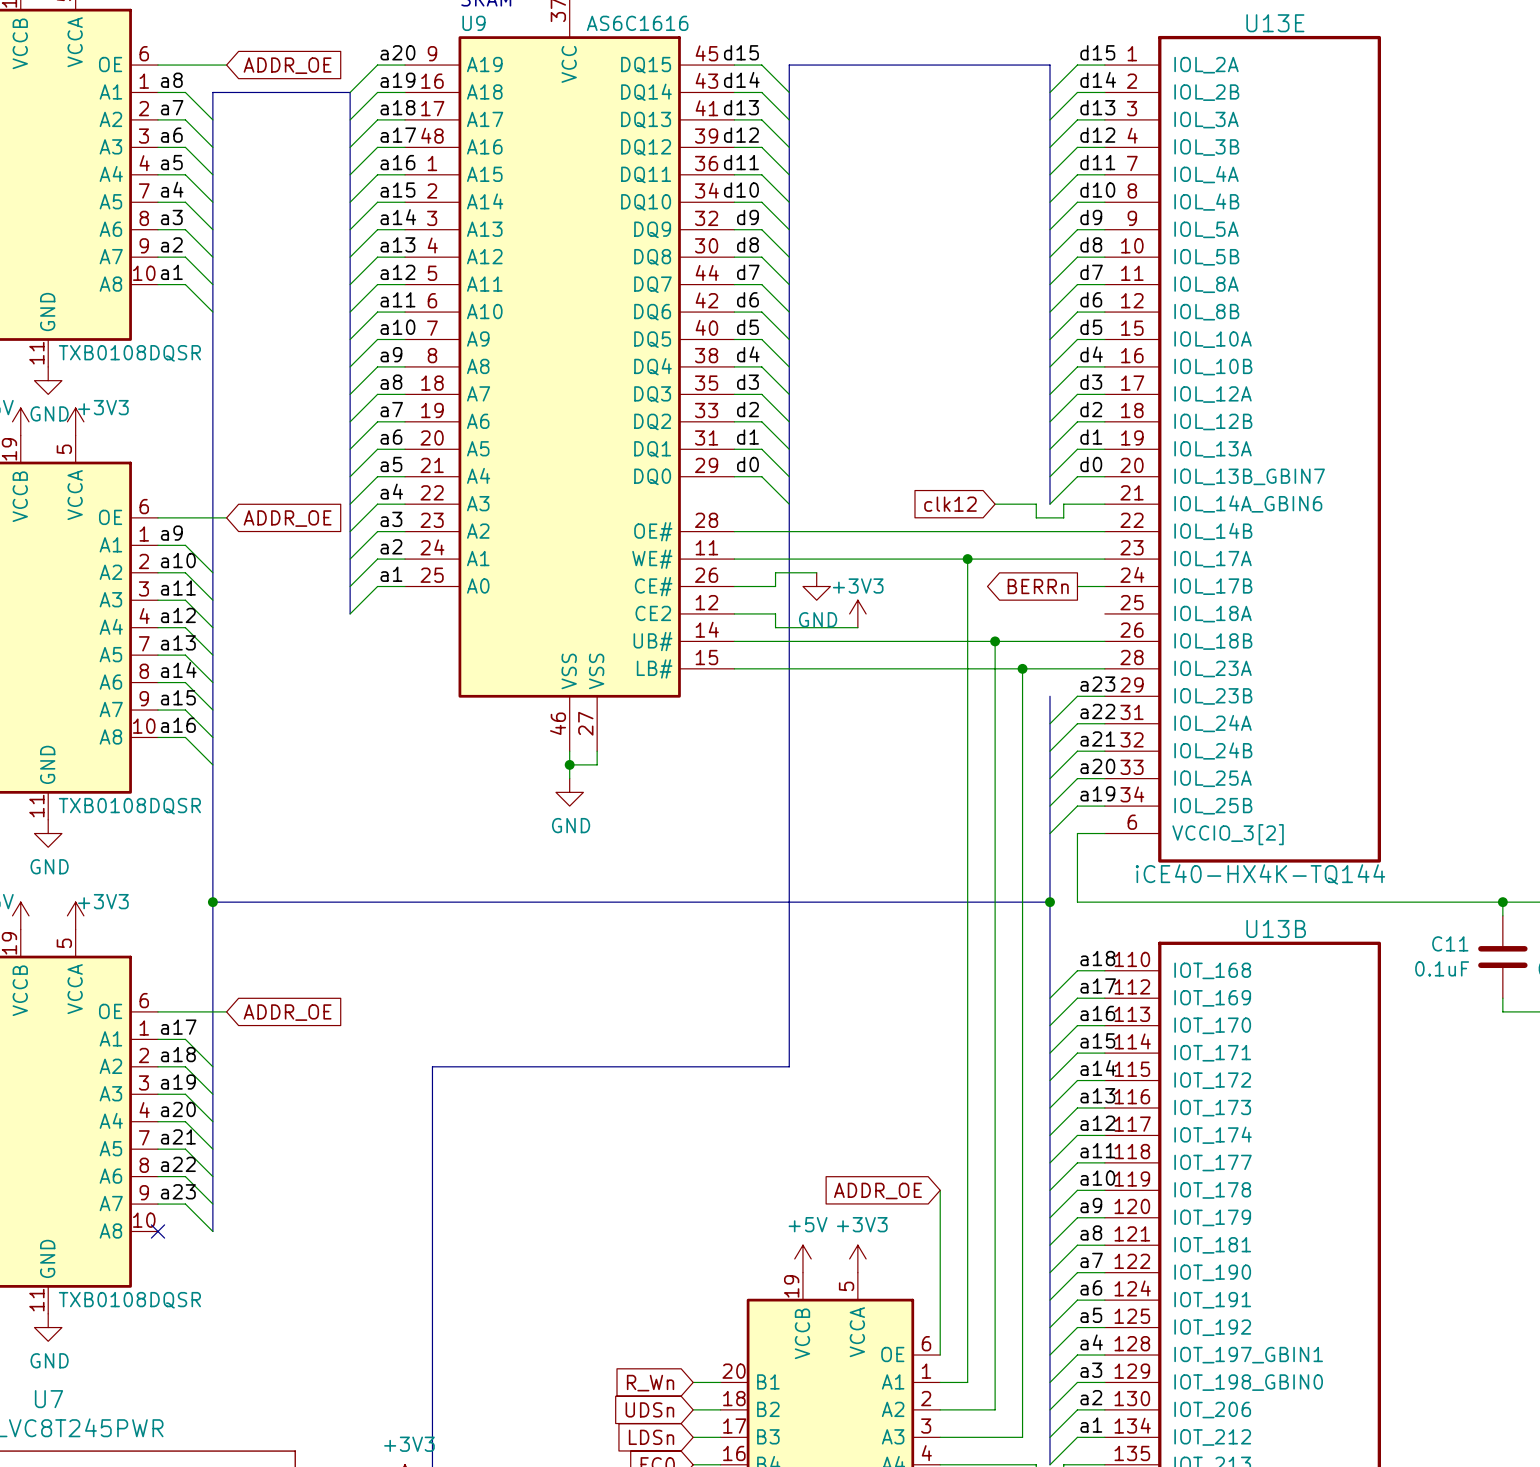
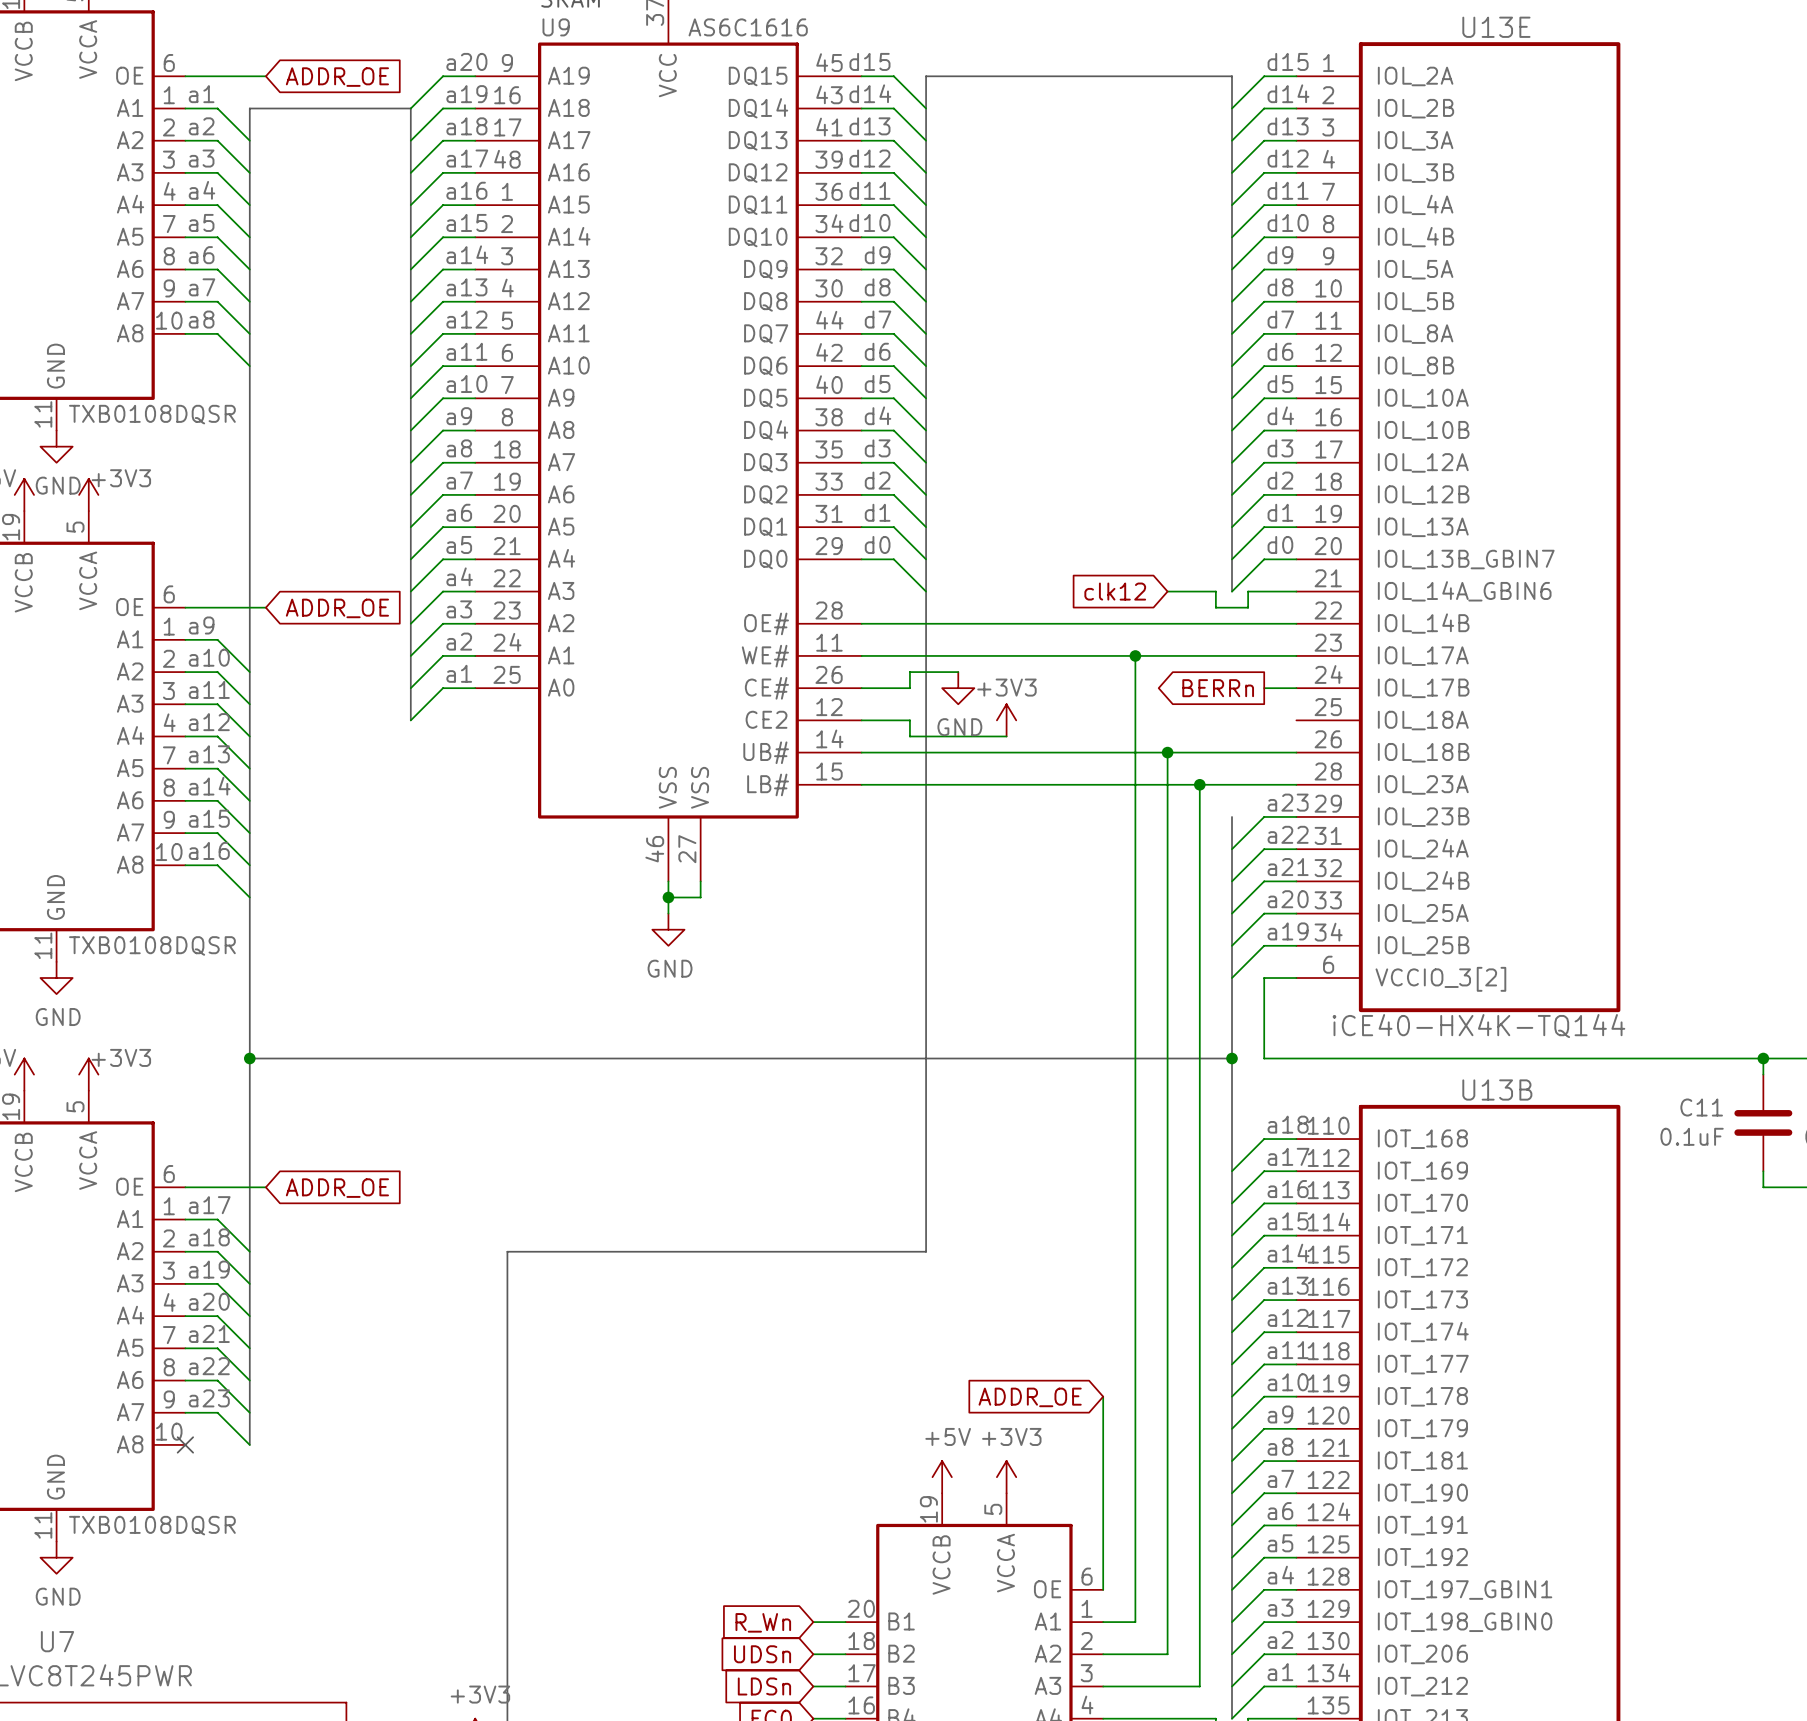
label: a8 (171, 80) -> a1 (201, 94)
label: a7 (172, 107) -> a2 (201, 126)
label: a6 (171, 135) -> a3 (201, 158)
label: a5 (171, 162) -> a4 (201, 190)
label: a4 (172, 189) -> a5 (201, 222)
label: a3 (171, 217) -> a6 (201, 255)
label: a2 (171, 244) -> a7 (201, 287)
label: a1 (171, 272) -> a8 (201, 319)

